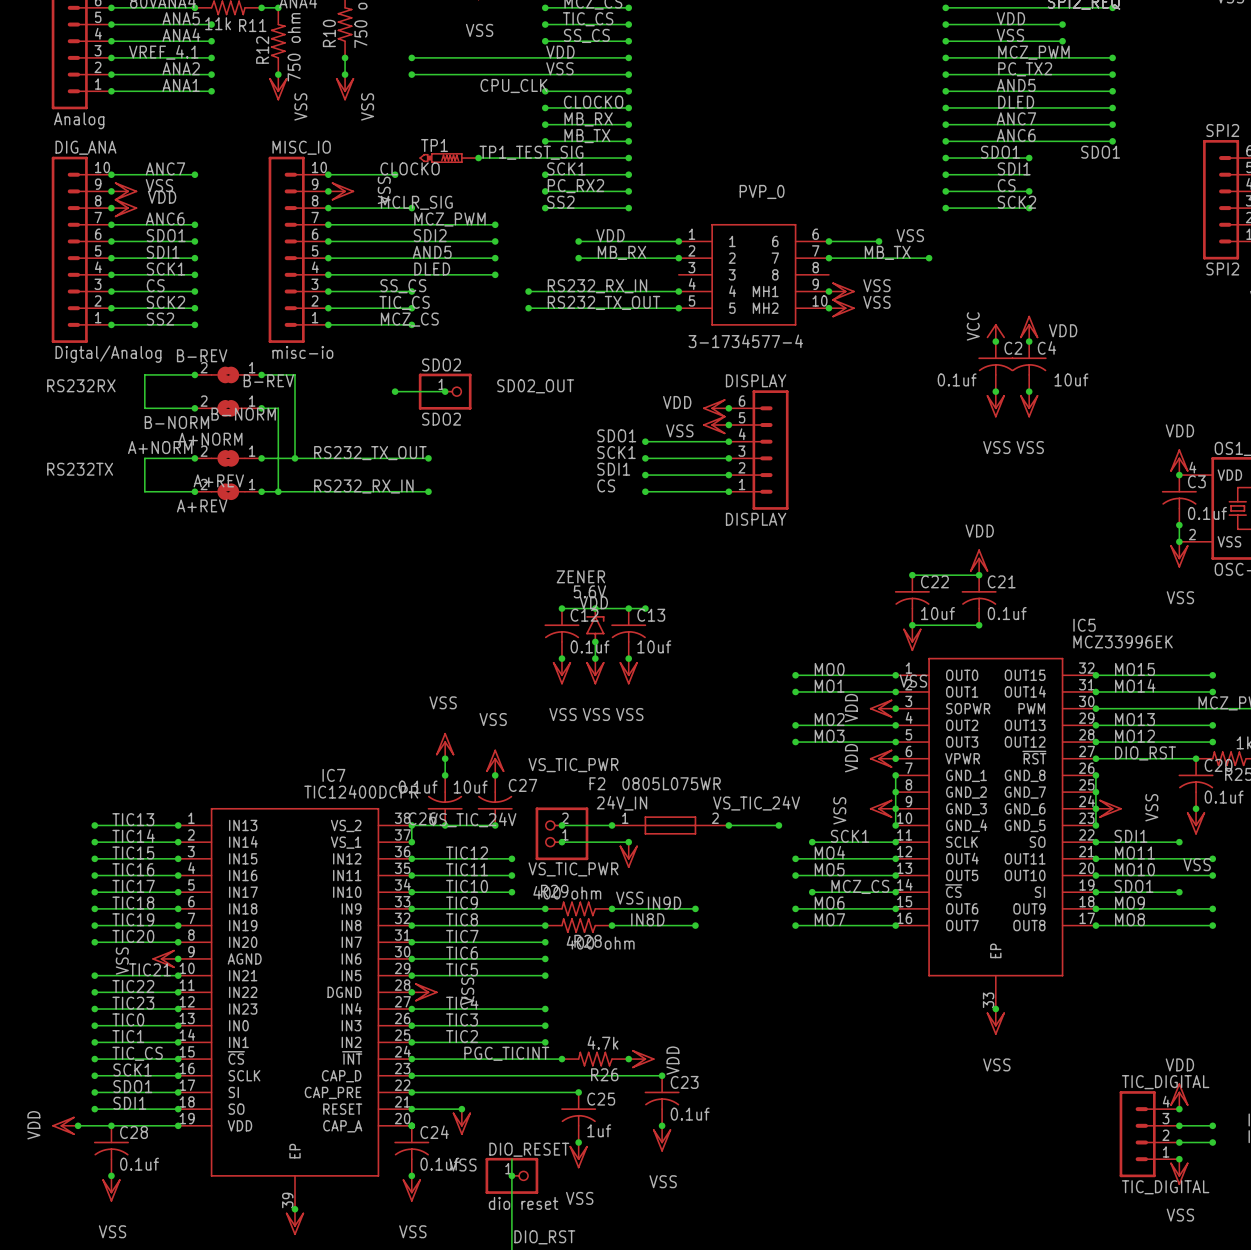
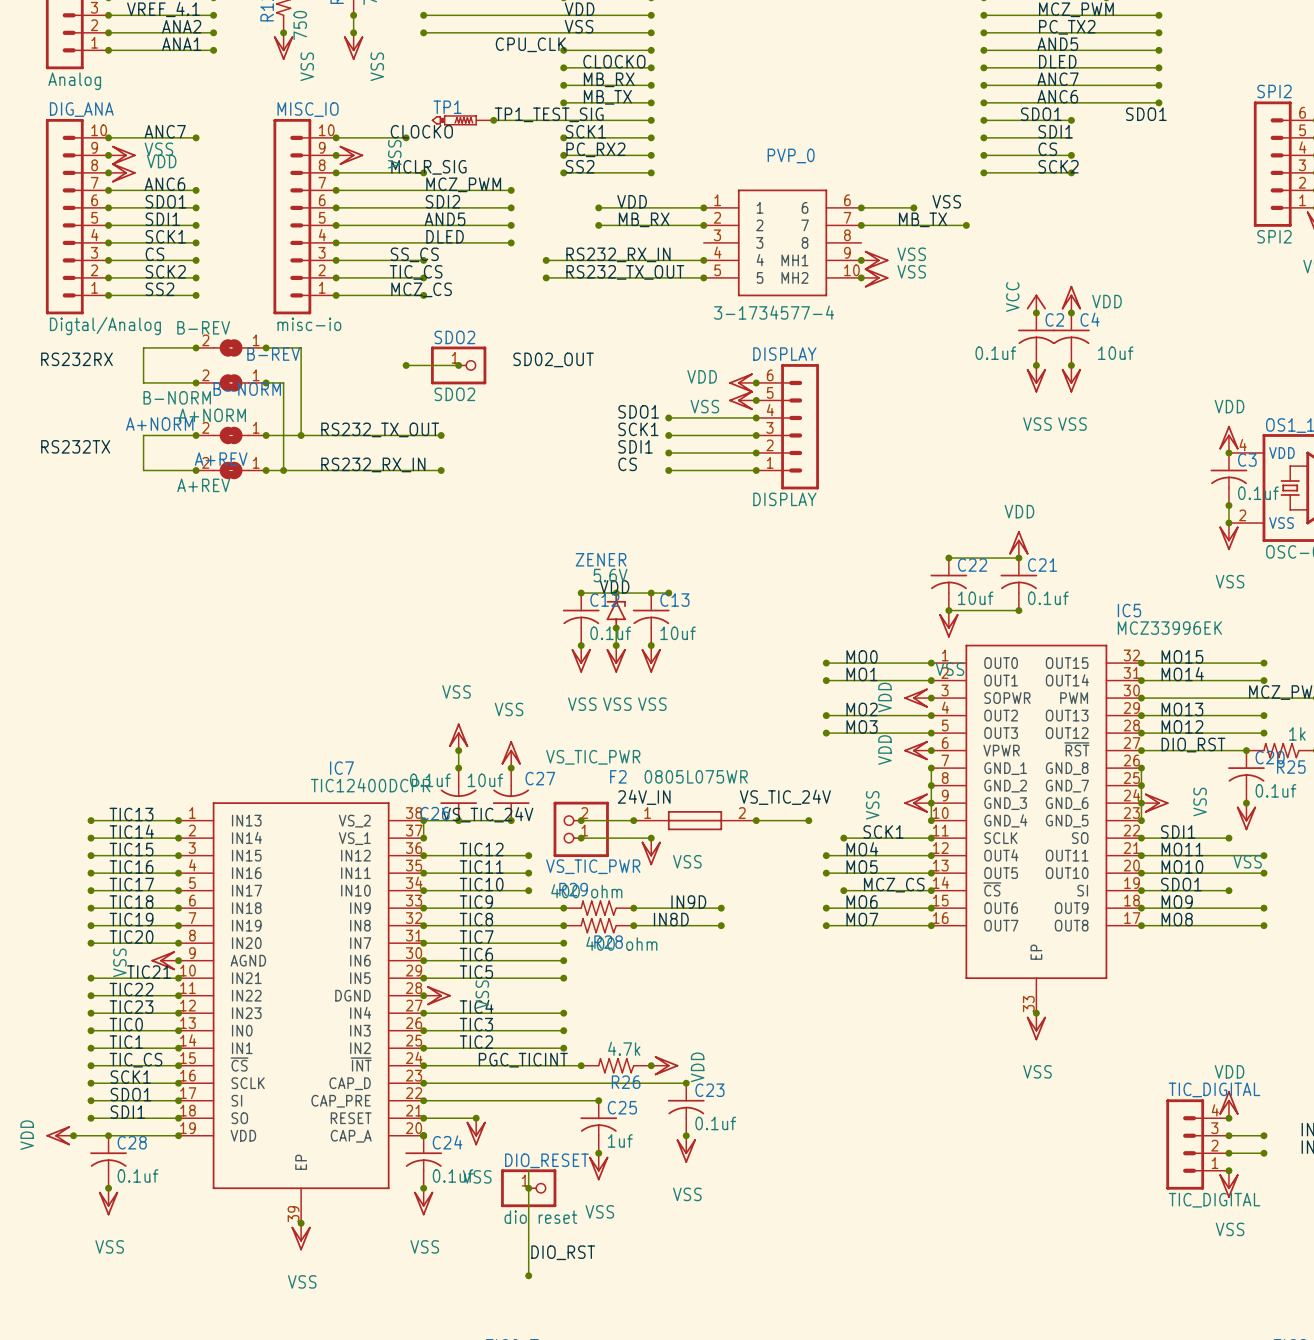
power symbol text position: VSS (629, 898) -> VSS (687, 861)

